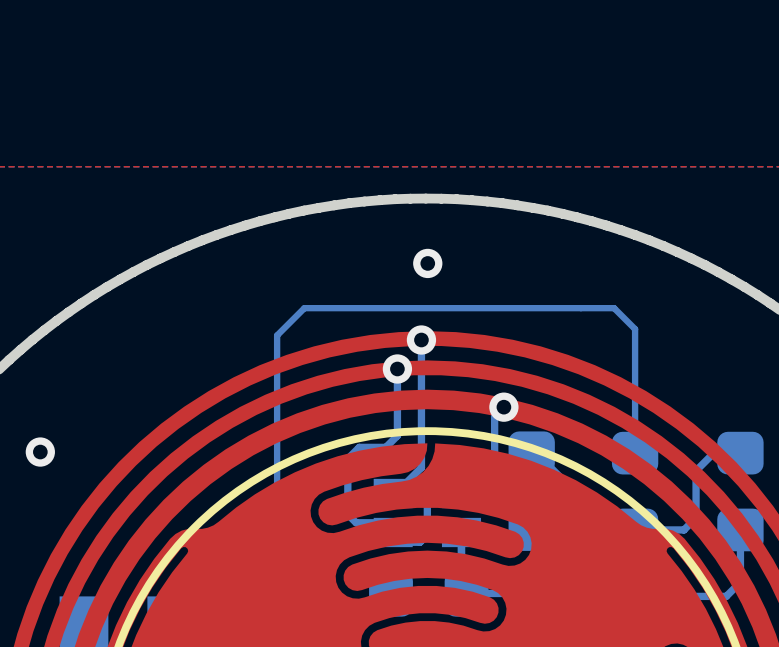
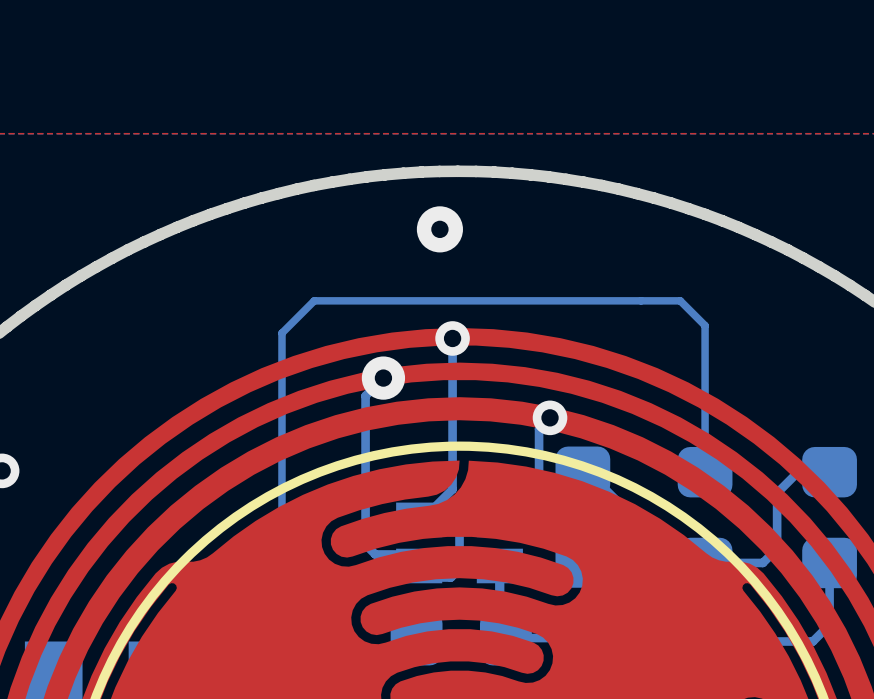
via position: (427, 263) -> (439, 229)
bottom track: (397, 368) (397, 435) (385, 447) (359, 447) (347, 458) -> (383, 378) (365, 395) (365, 478)
via: (397, 368) -> none
via: none -> (383, 378)

